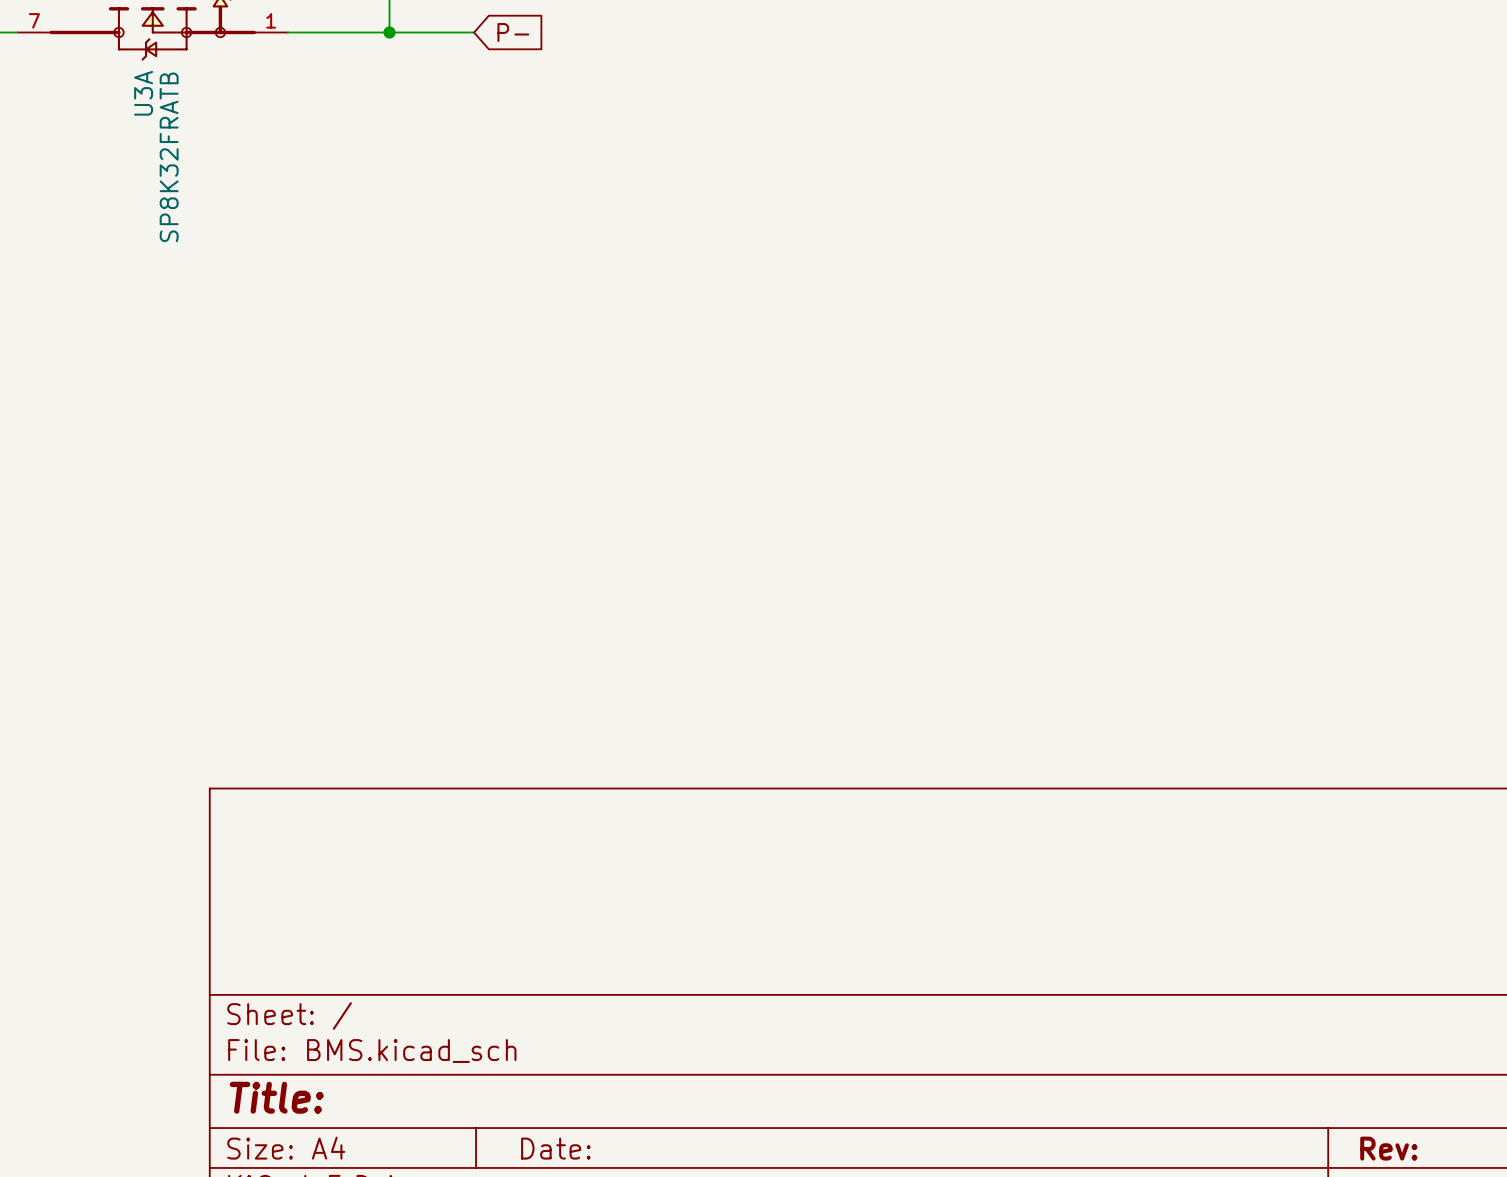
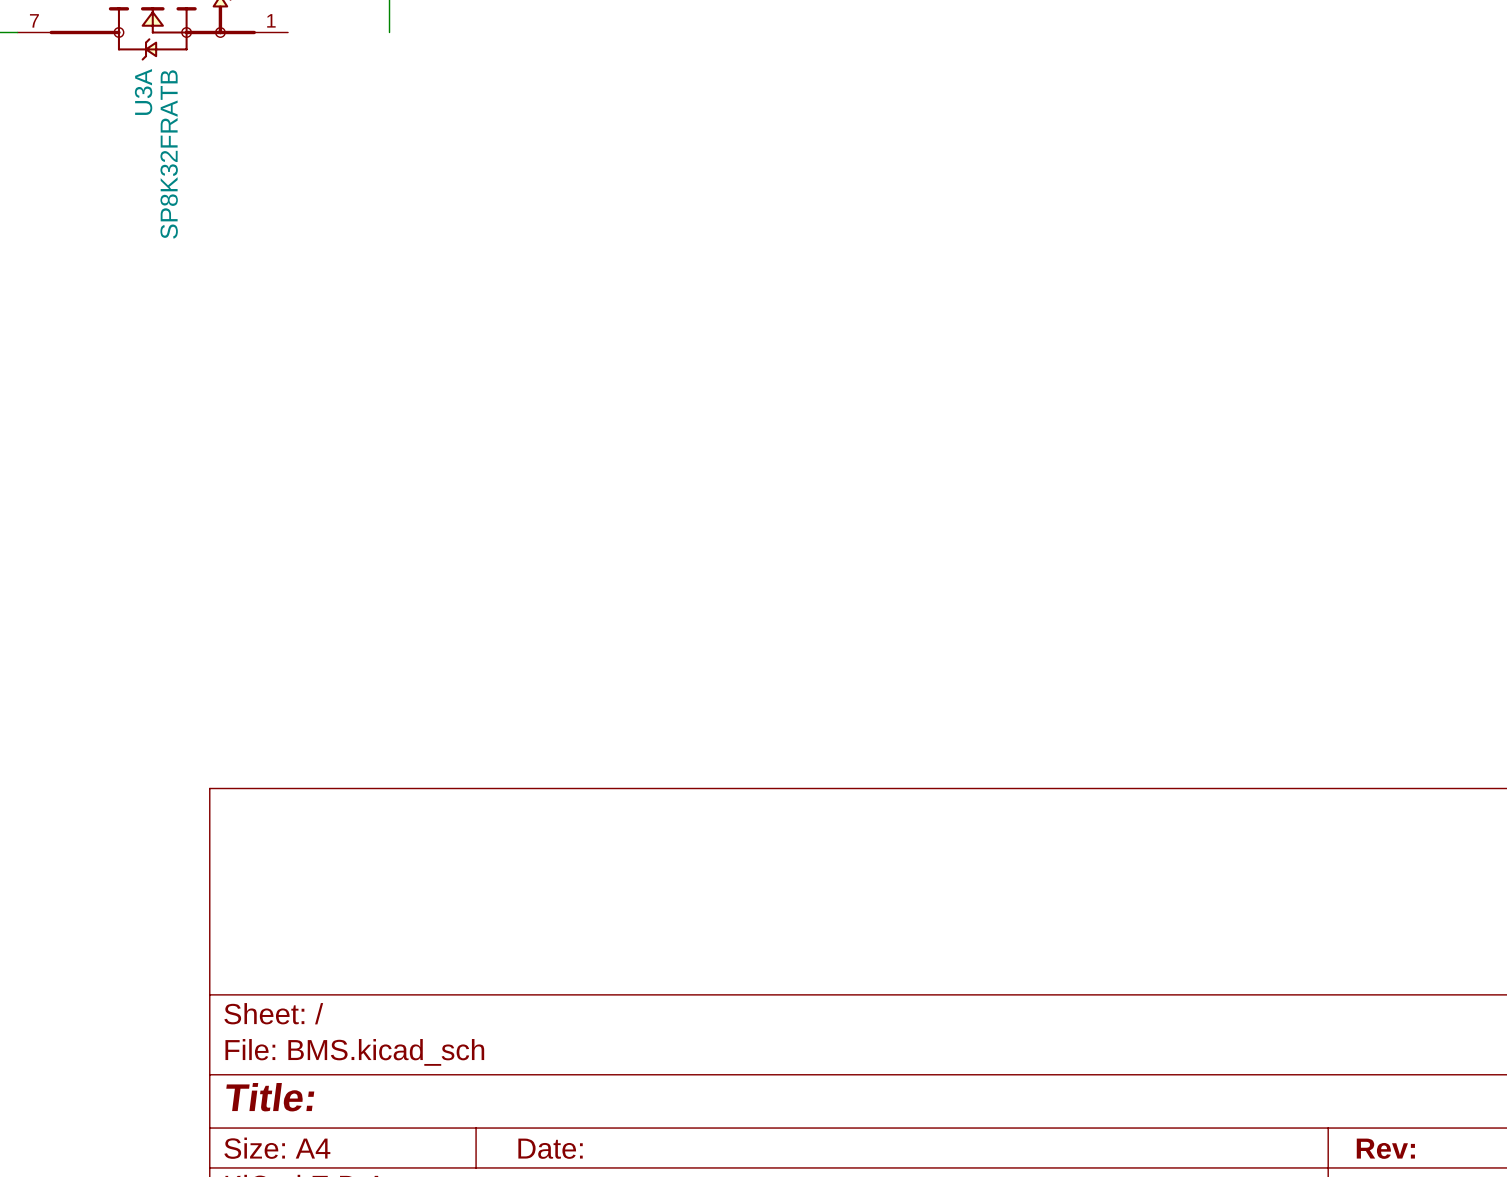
wire: (288, 32) (474, 32) -> none
junction: (389, 32) -> none
global label: P- (513, 32) -> none

